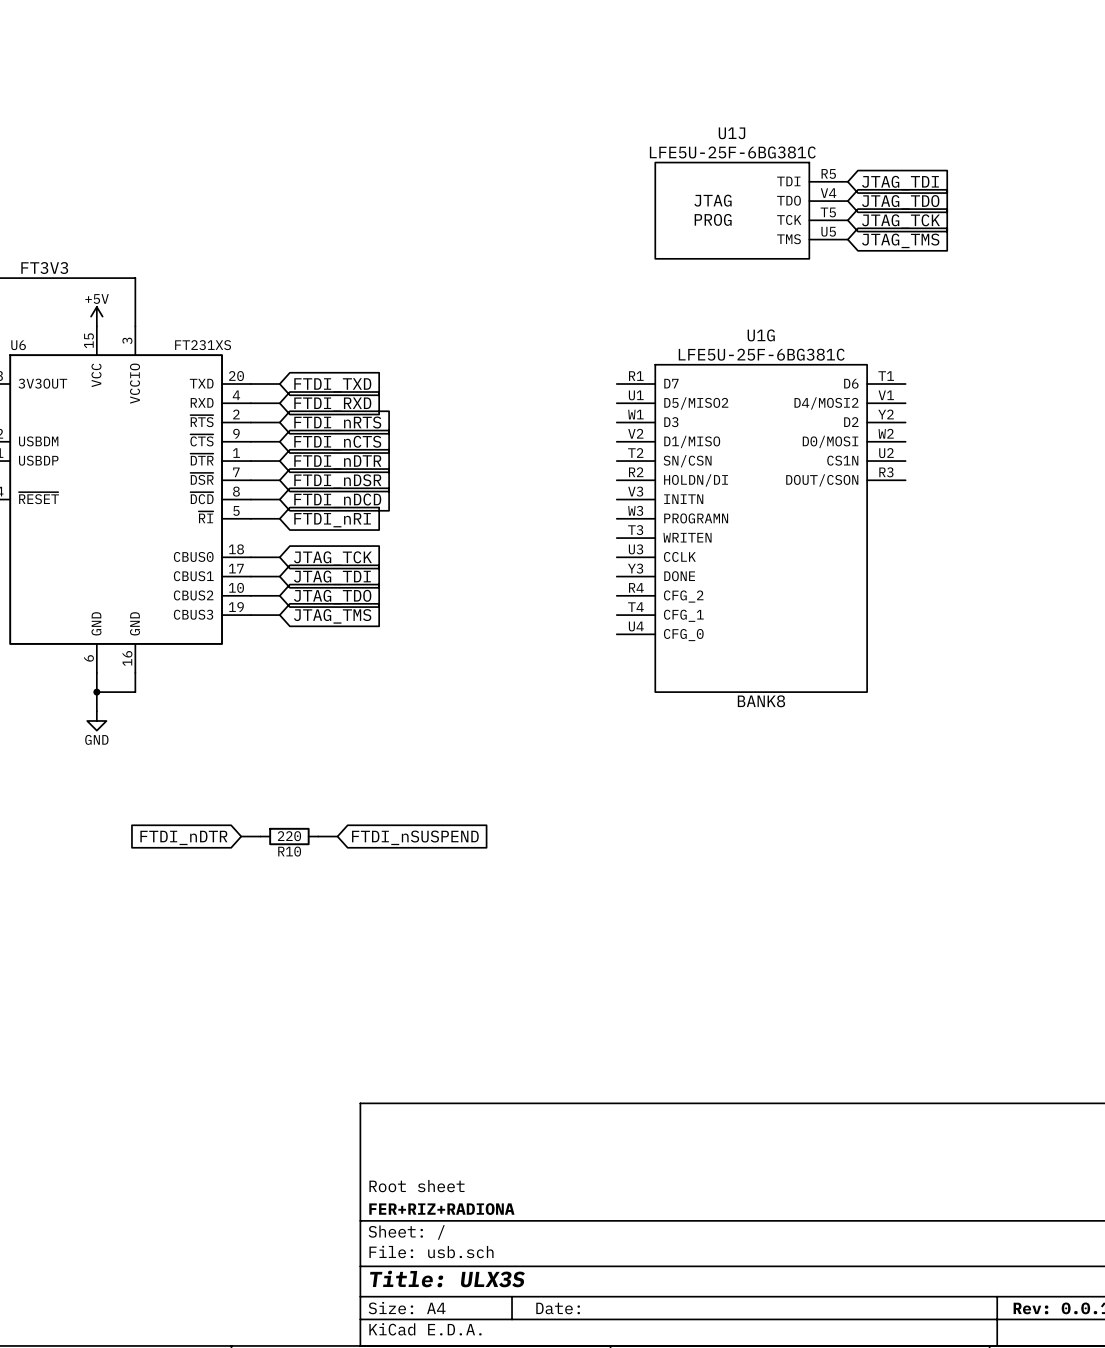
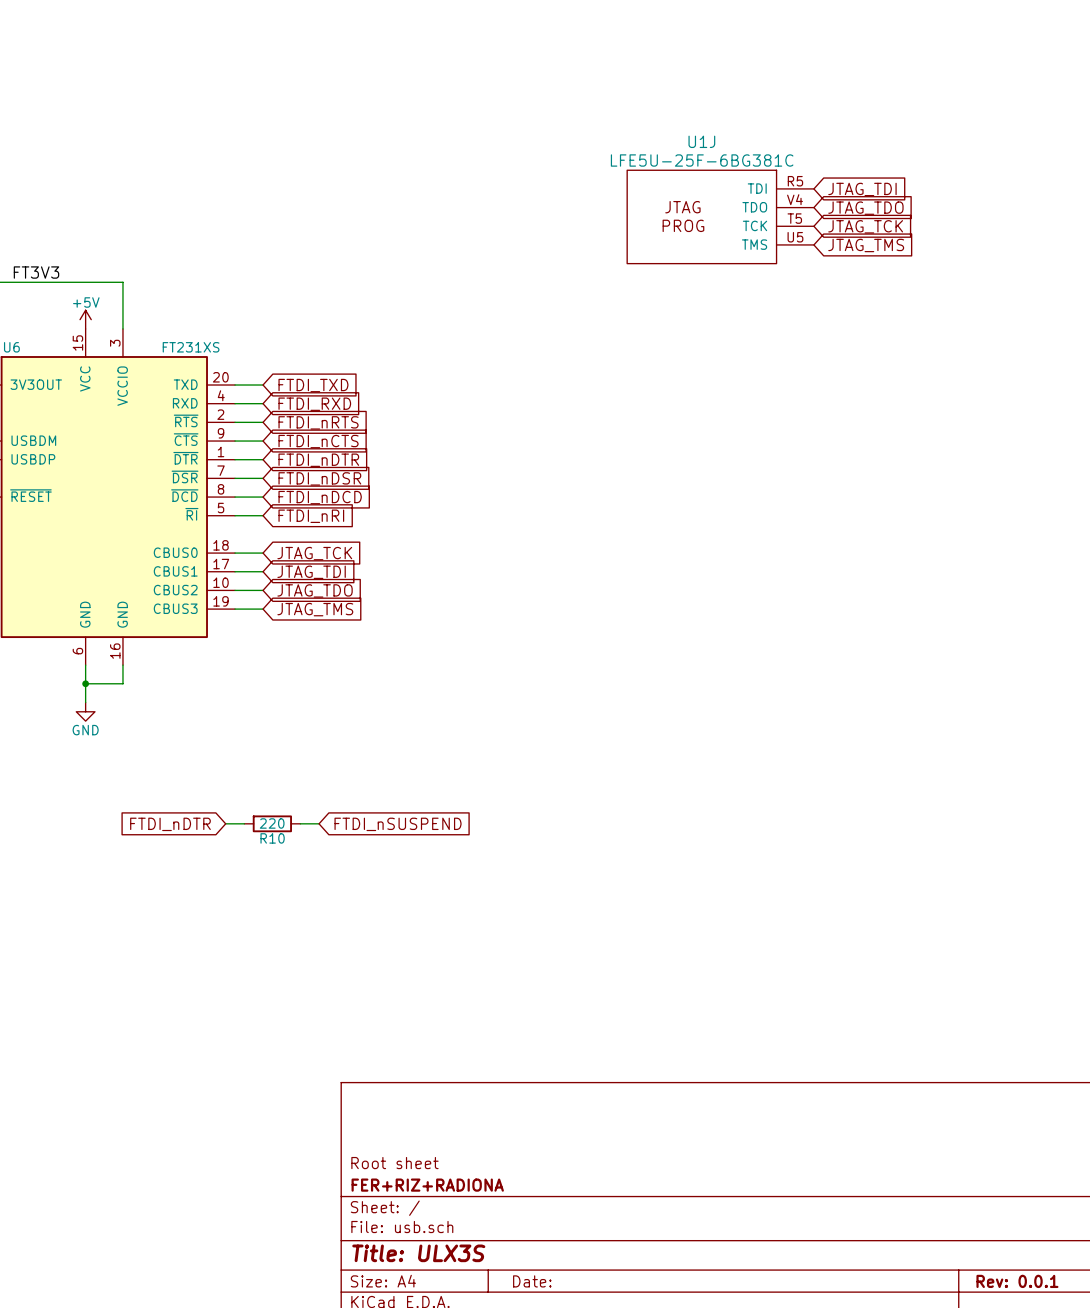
U1G: LFE5U-25F-6BG381C (761, 528) -> none

